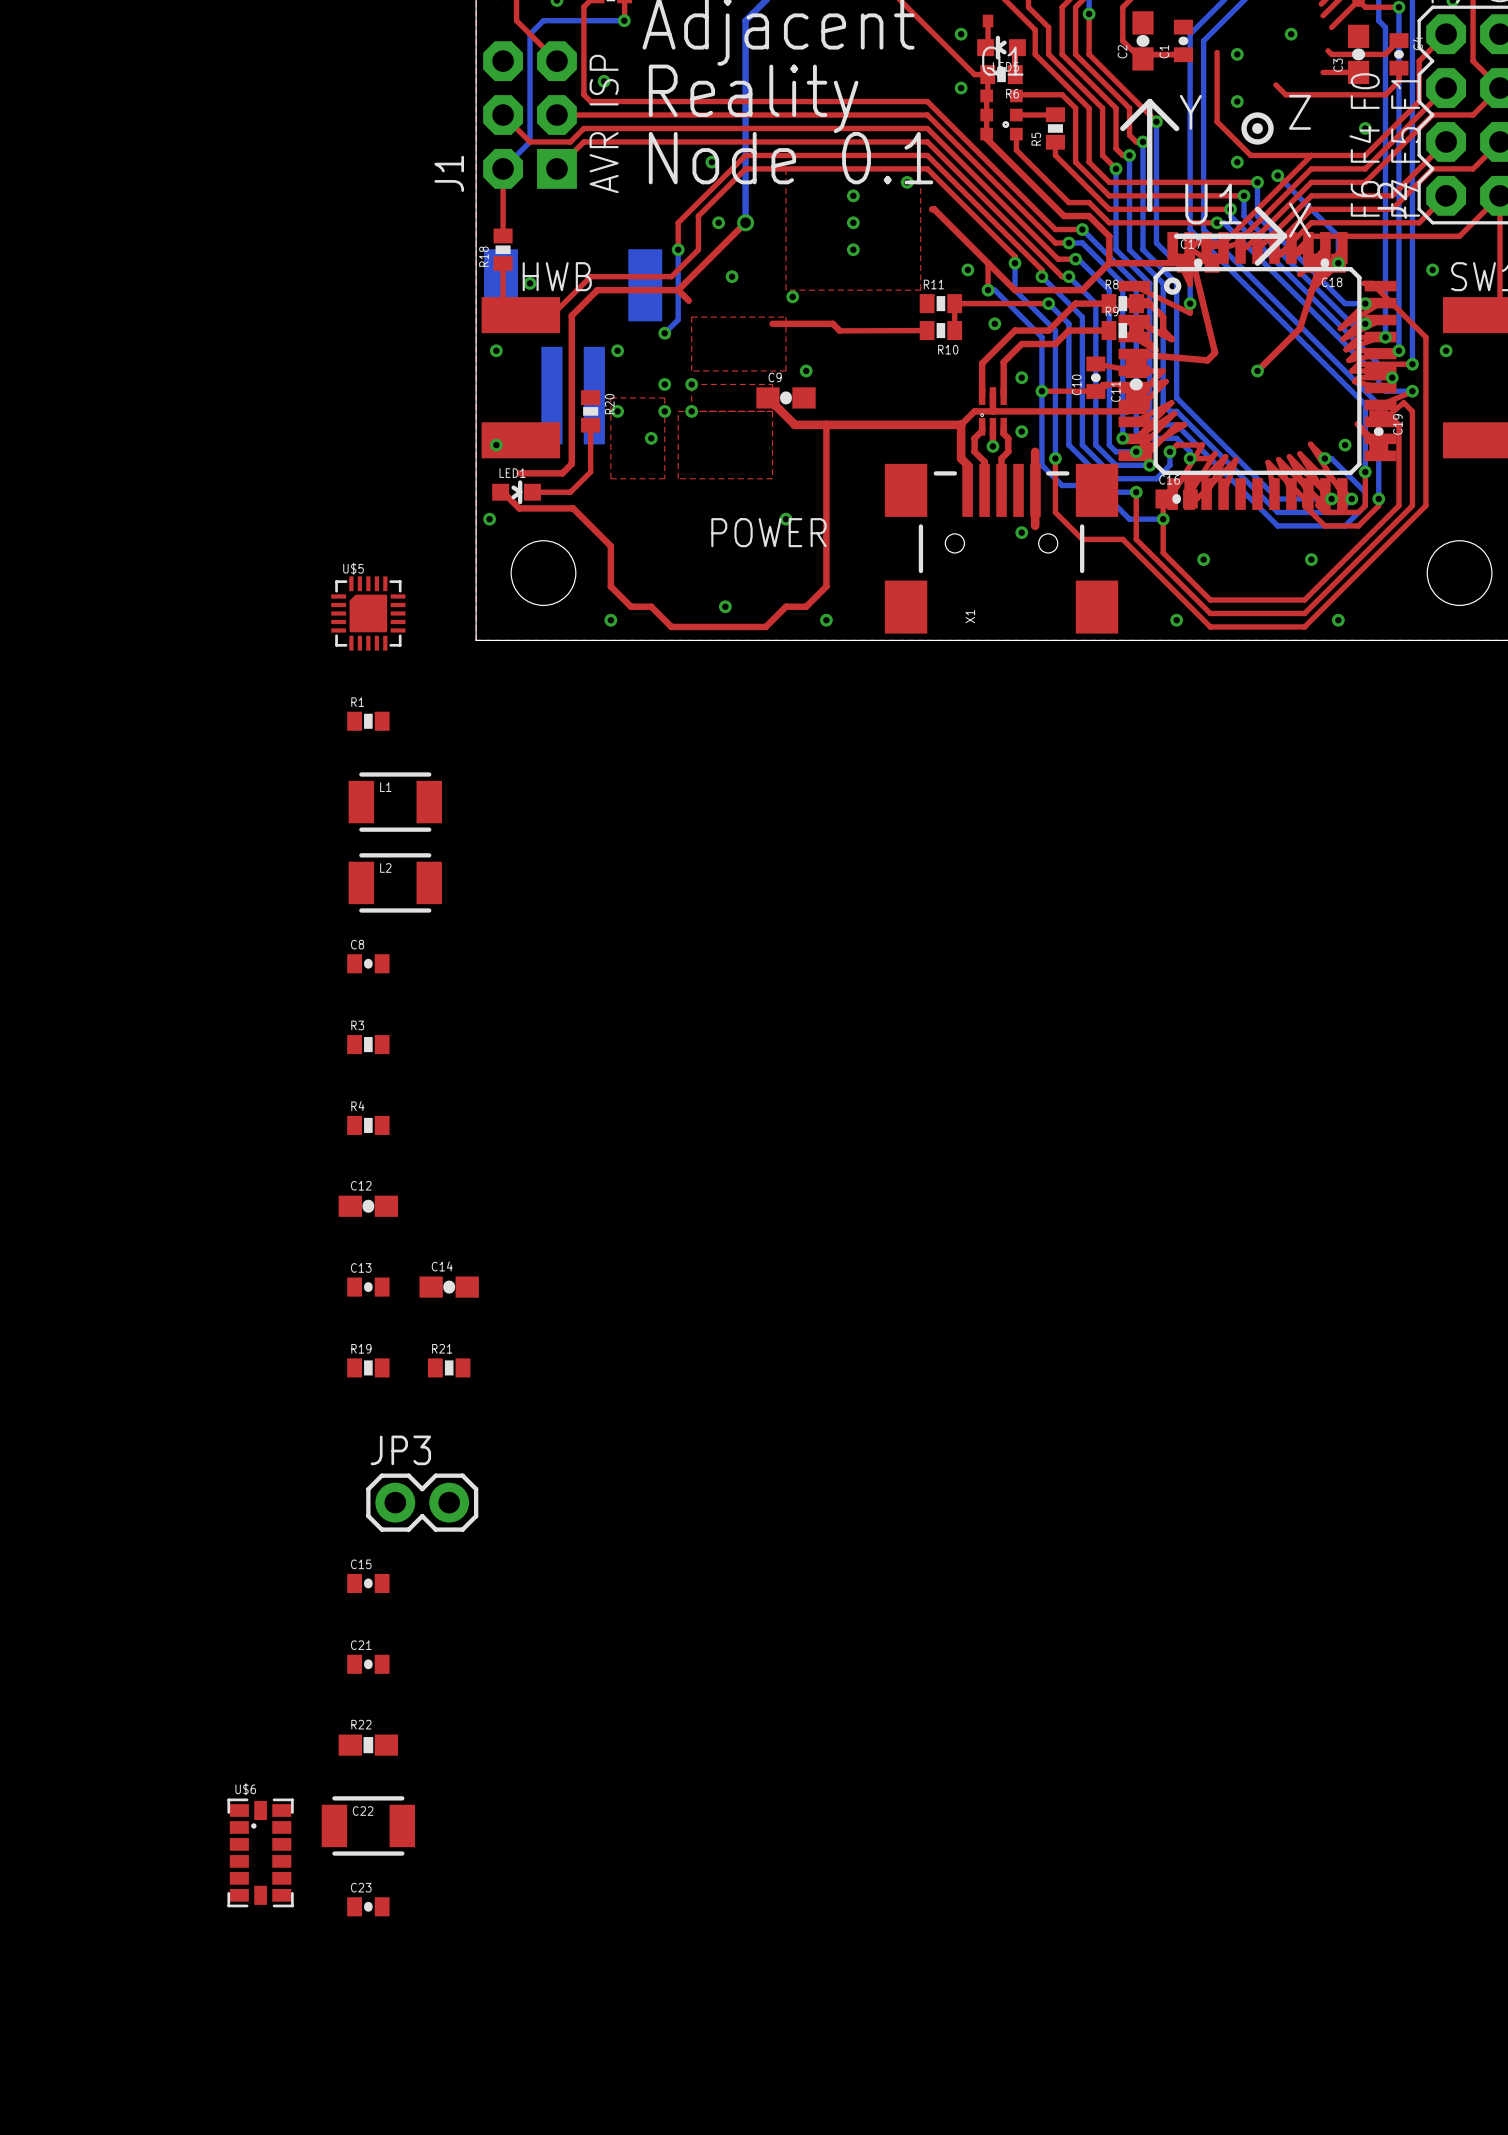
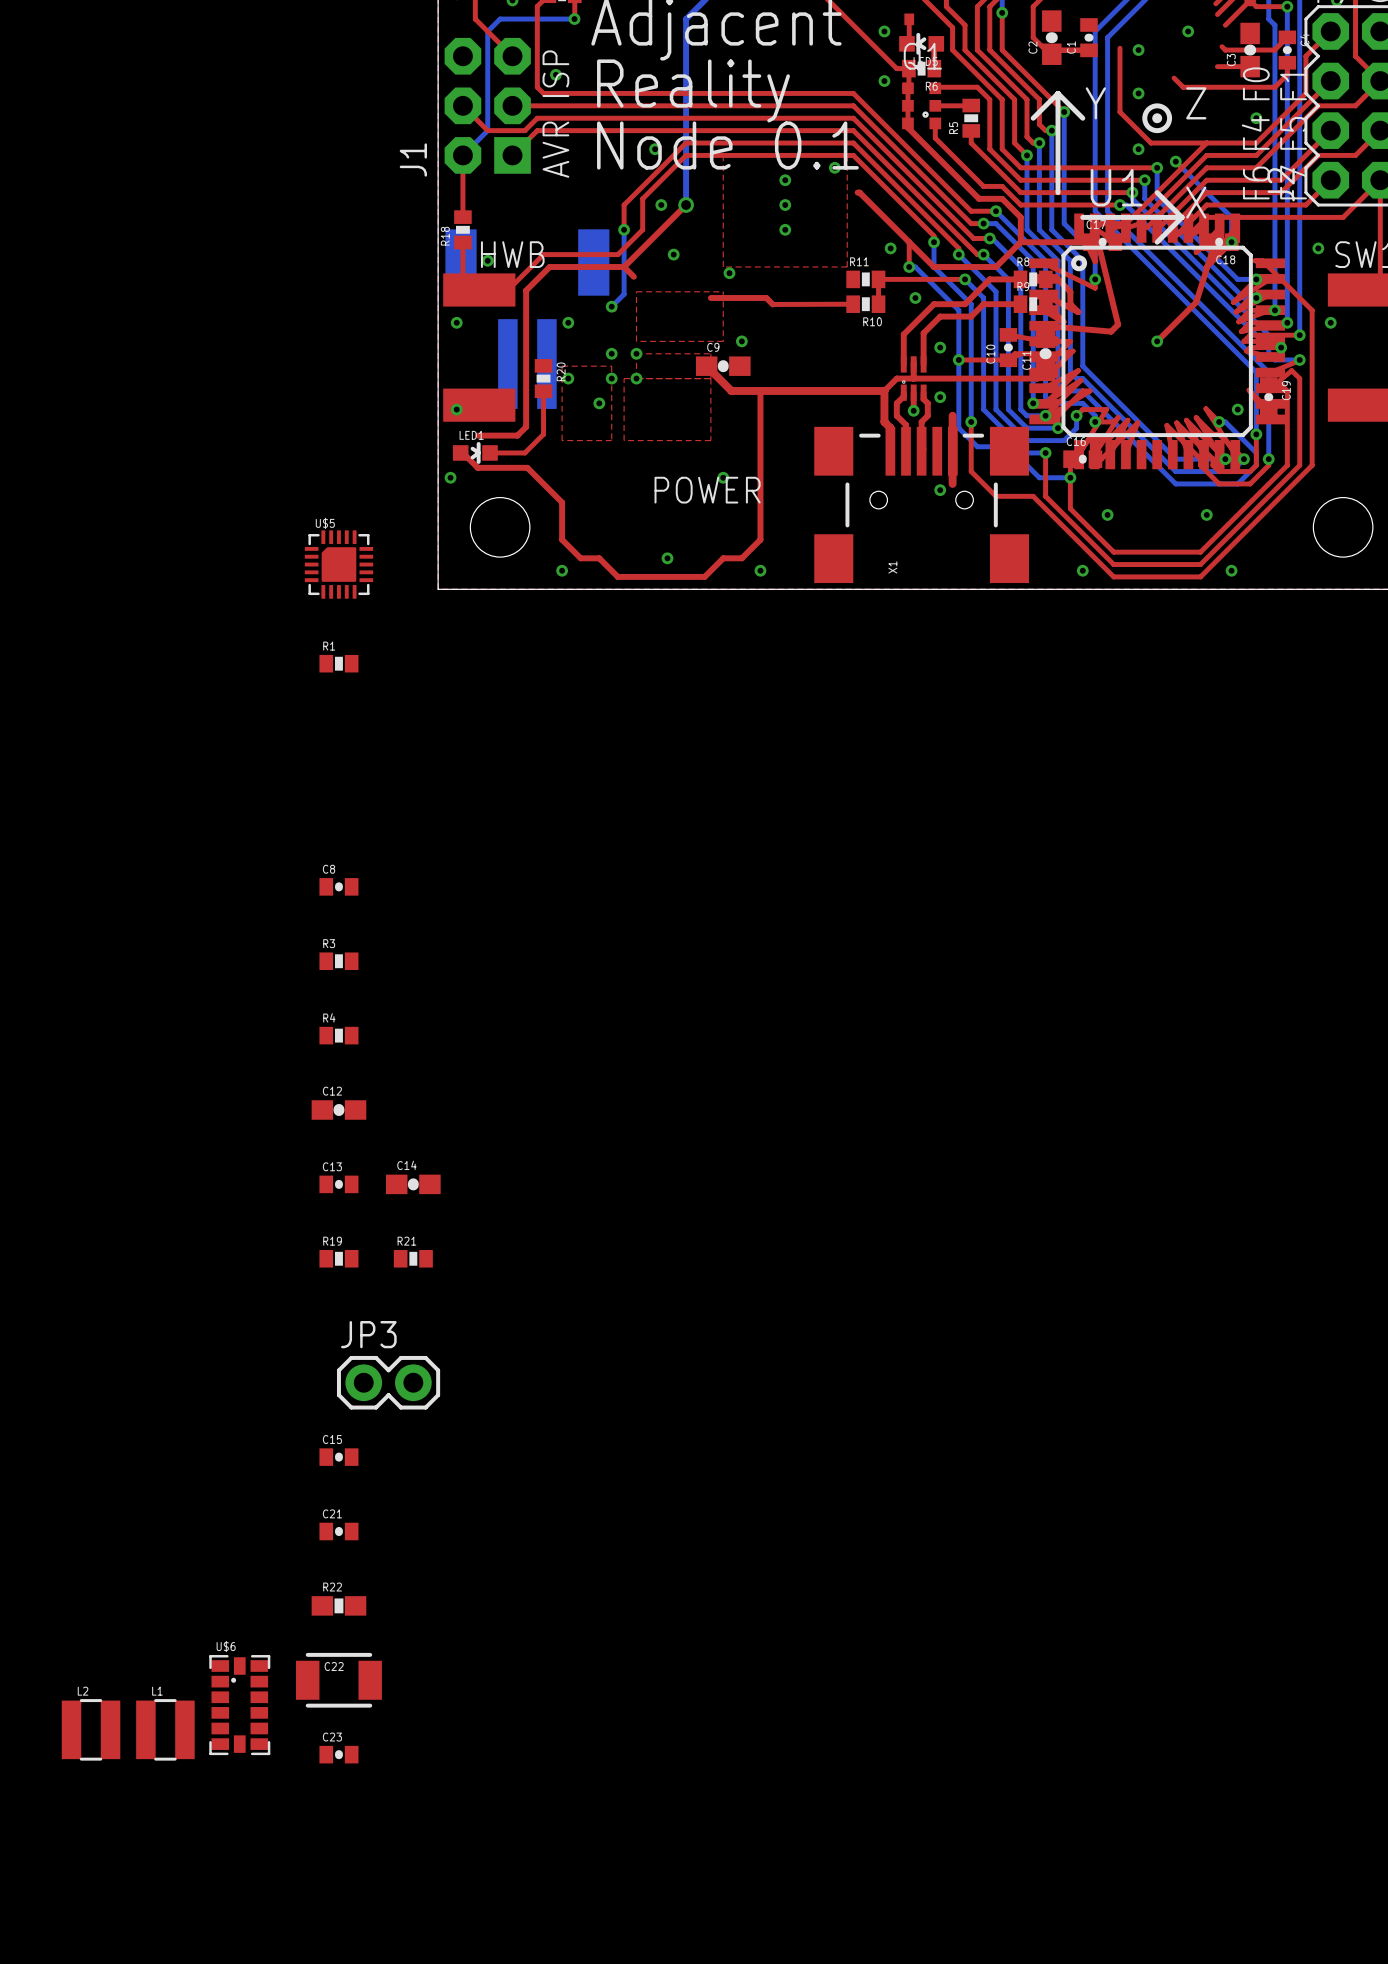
L1 footprint: [348, 772, 442, 832] -> [136, 1699, 195, 1761]
L2 footprint: [348, 853, 442, 913] -> [61, 1699, 121, 1761]

